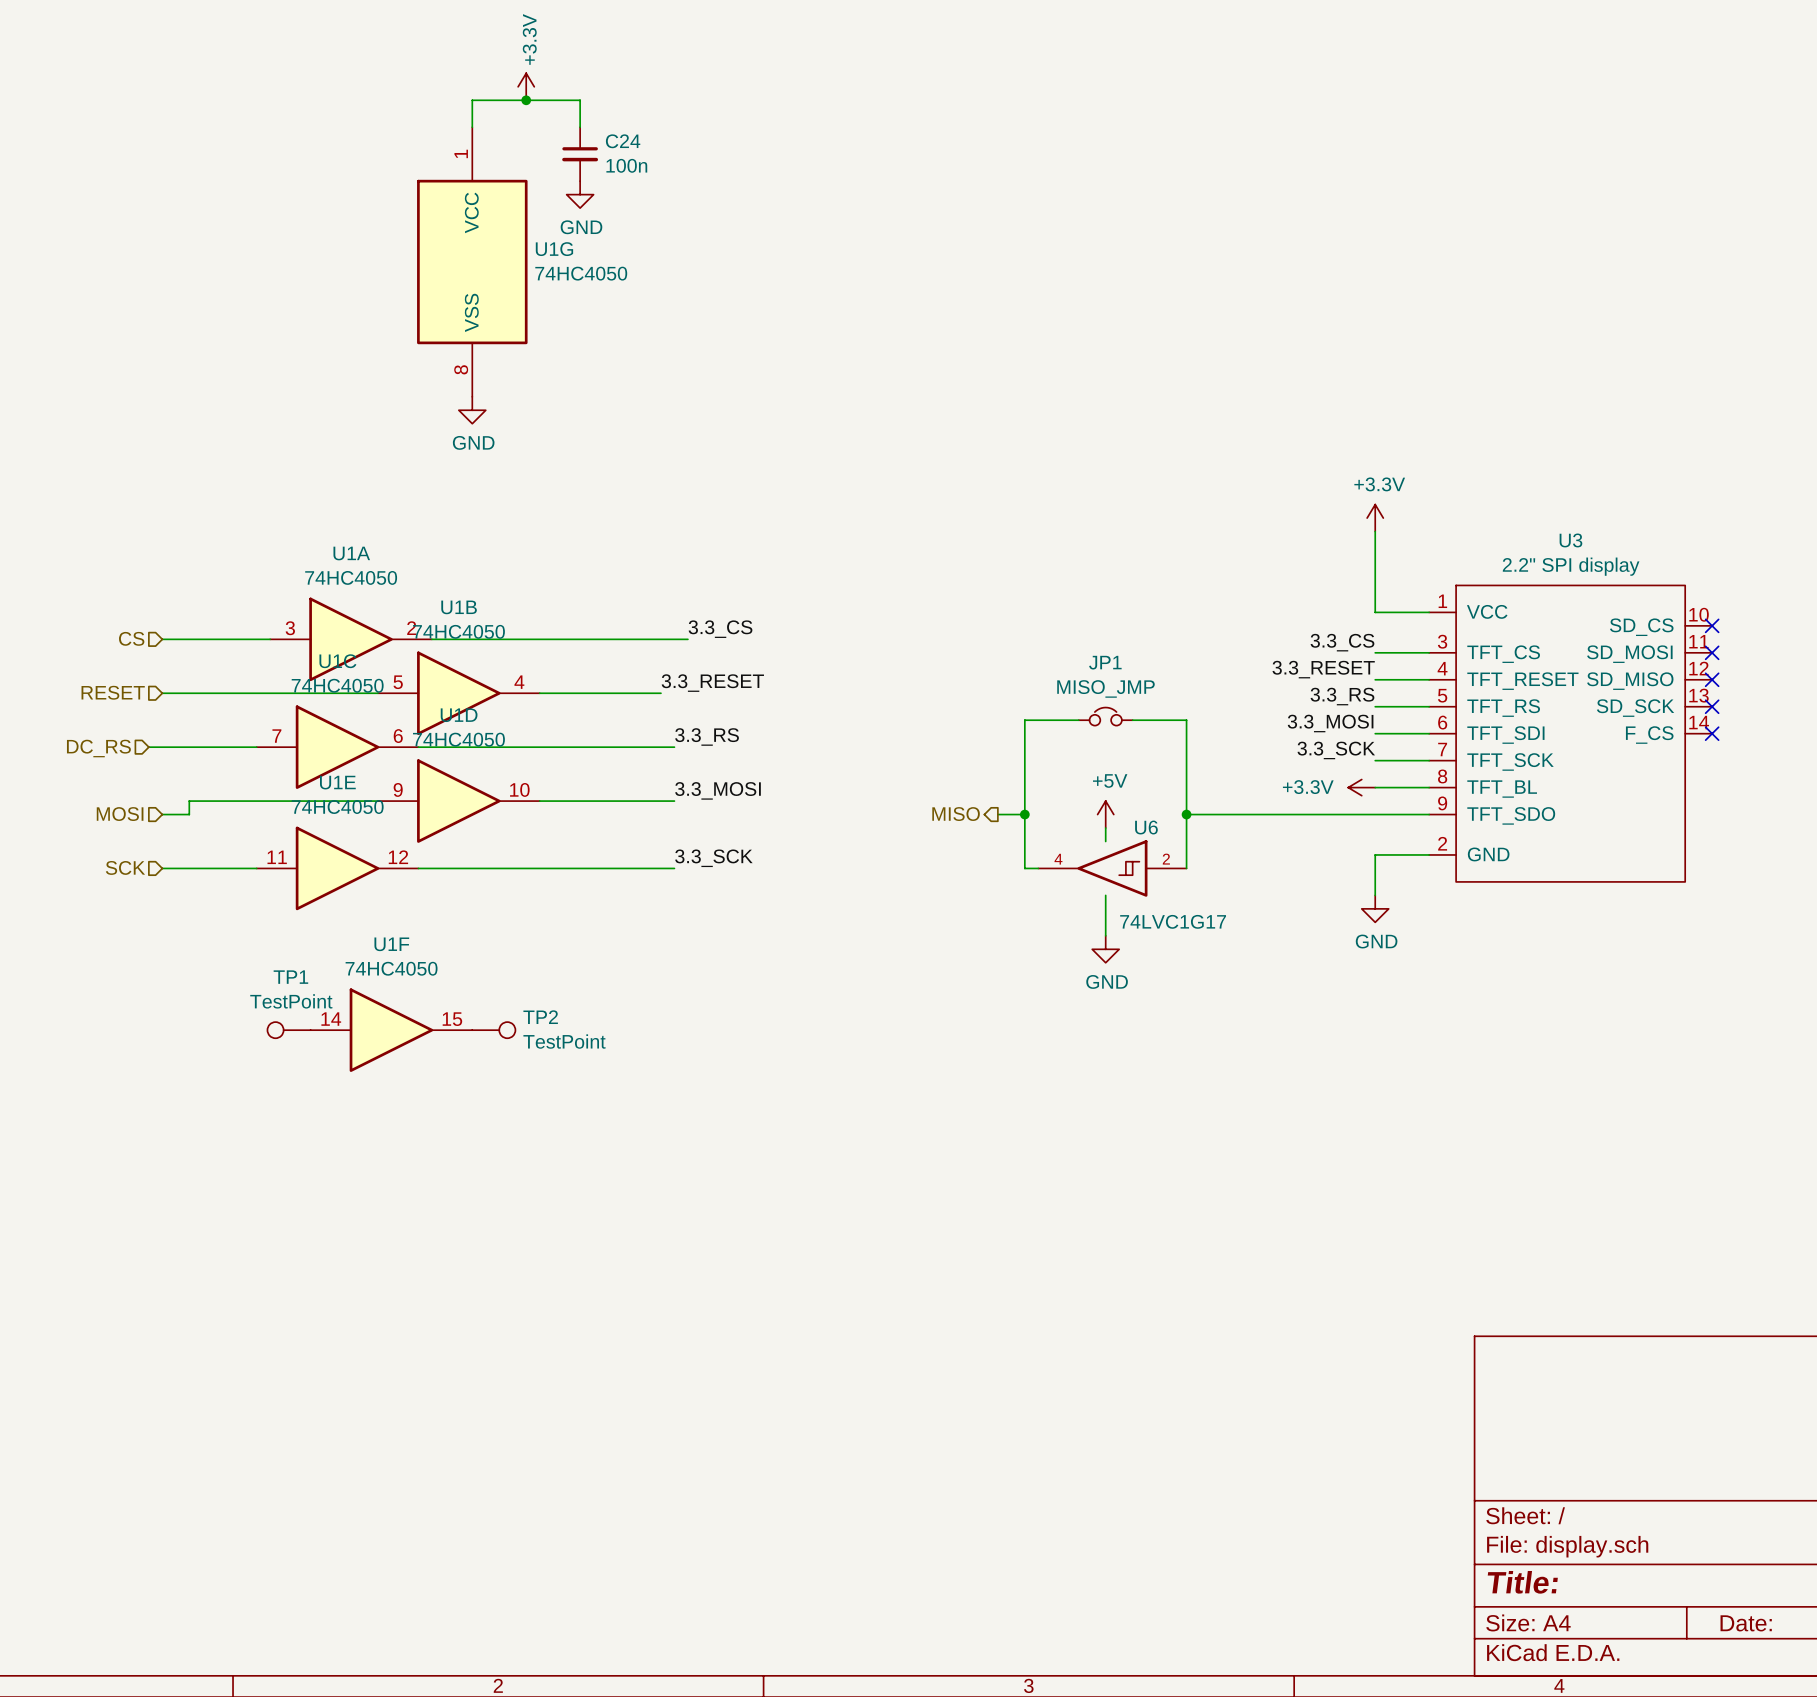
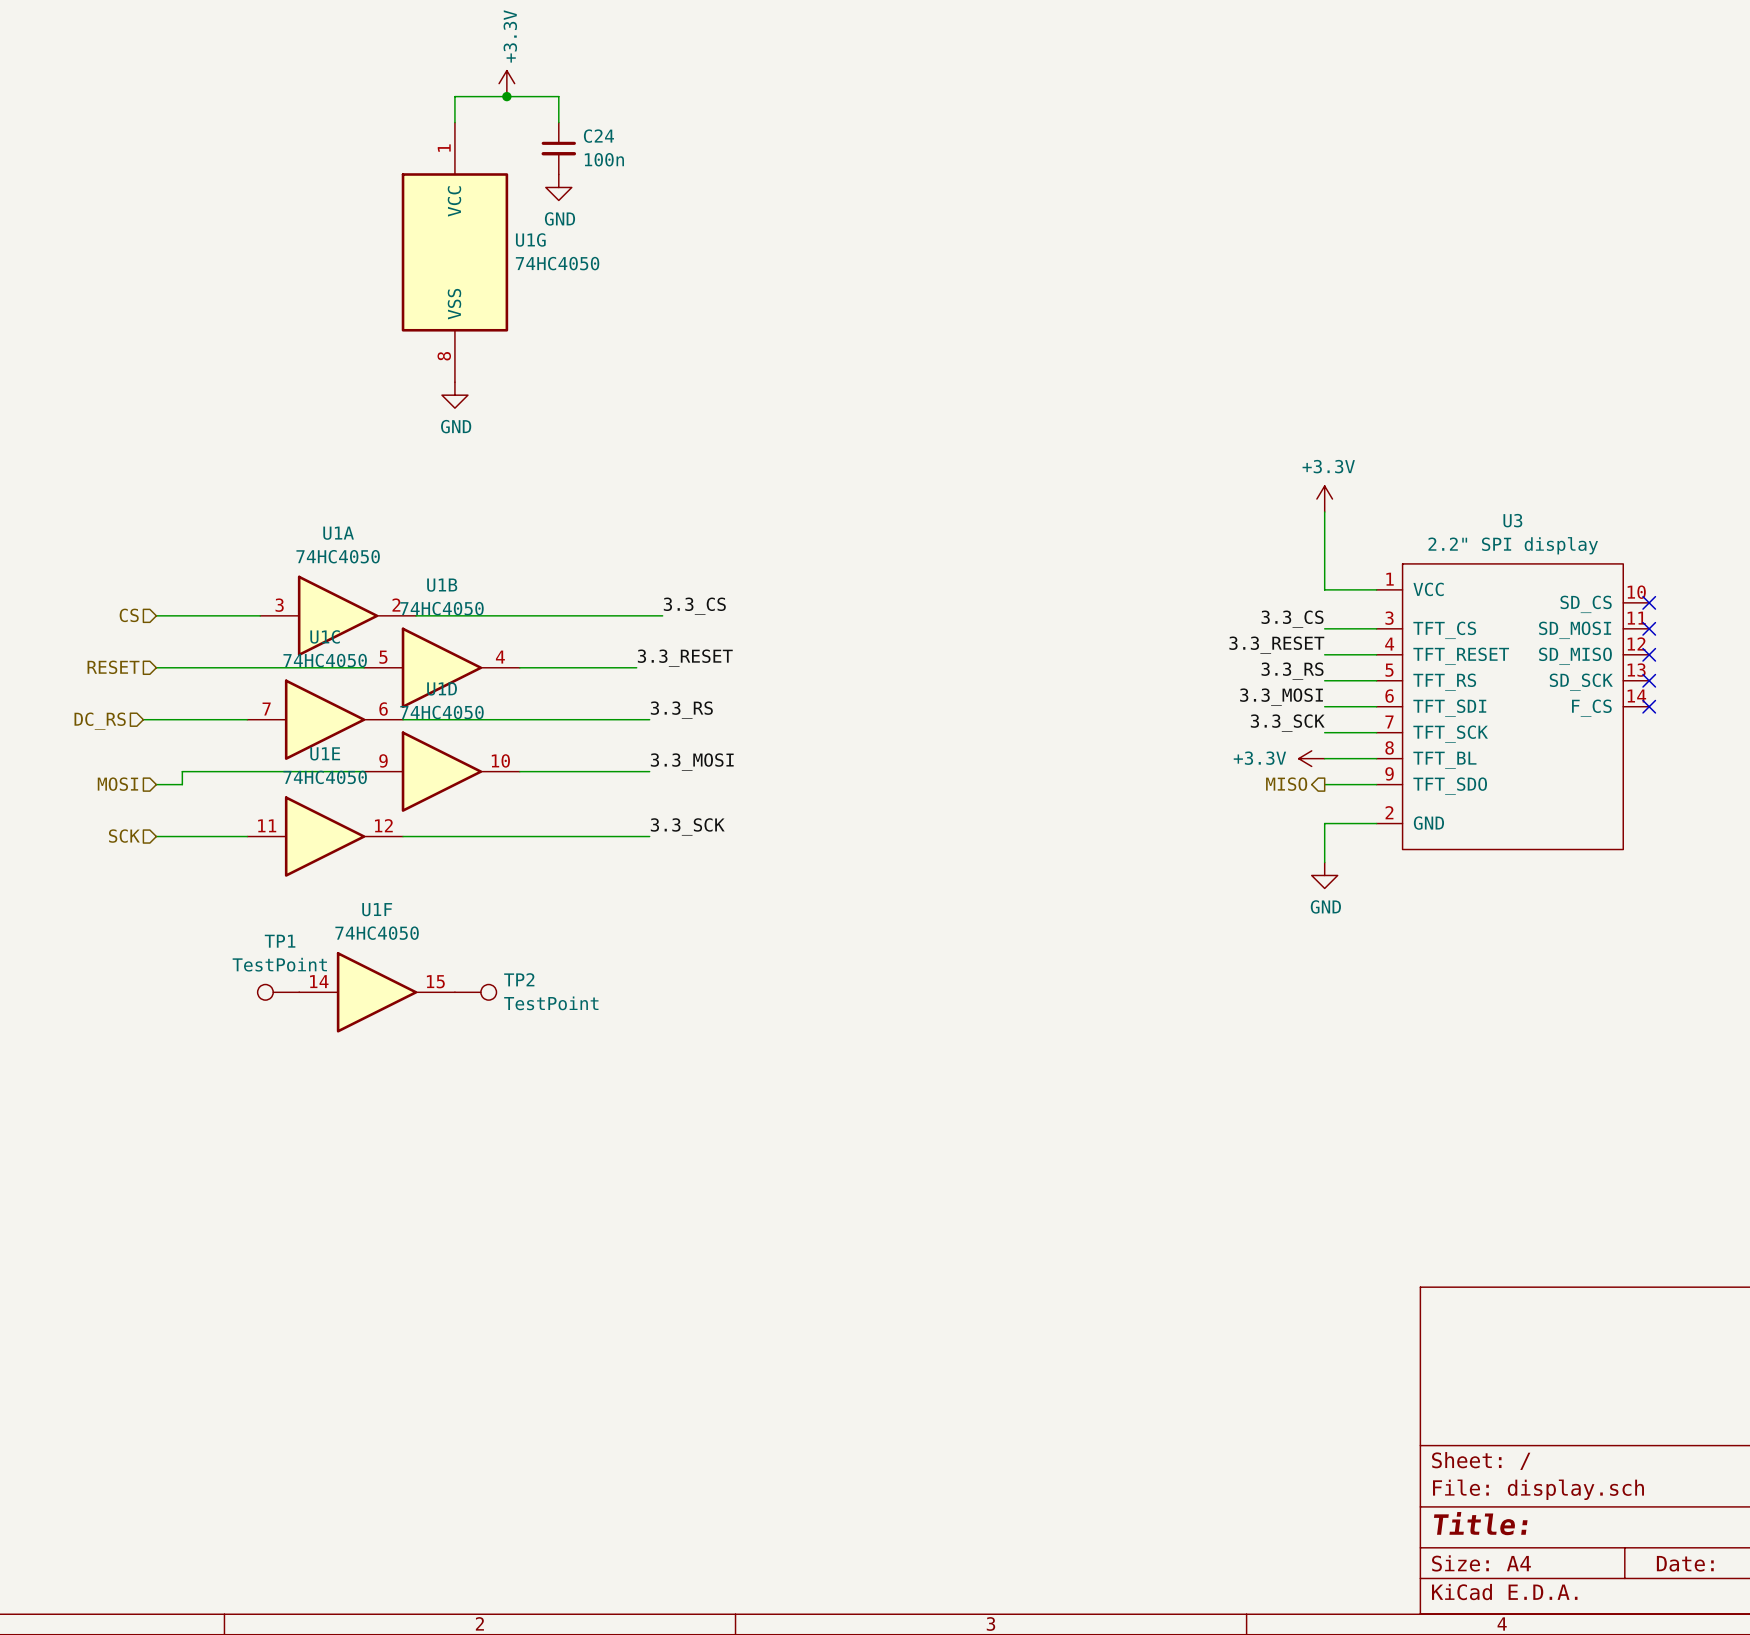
JP1: MISO_JMP (1105, 716) -> none
wire: (1078, 720) (1024, 720) (1024, 868) (1038, 868) -> none
wire: (1132, 720) (1186, 720) (1186, 868) -> none
hierarchical label: MISO (956, 814) -> none
wire: (997, 814) (1024, 814) -> none
junction: (1024, 814) -> none
power symbol: +5V (1105, 814) -> none
wire: (1186, 814) (1375, 814) -> none
junction: (1186, 814) -> none
hierarchical label: none -> MISO (1286, 784)
wire: (1105, 828) (1105, 841) -> none
U6: 74LVC1G17 (1112, 868) -> none
wire: (1105, 895) (1105, 935) -> none
power symbol: GND (1105, 949) -> none

